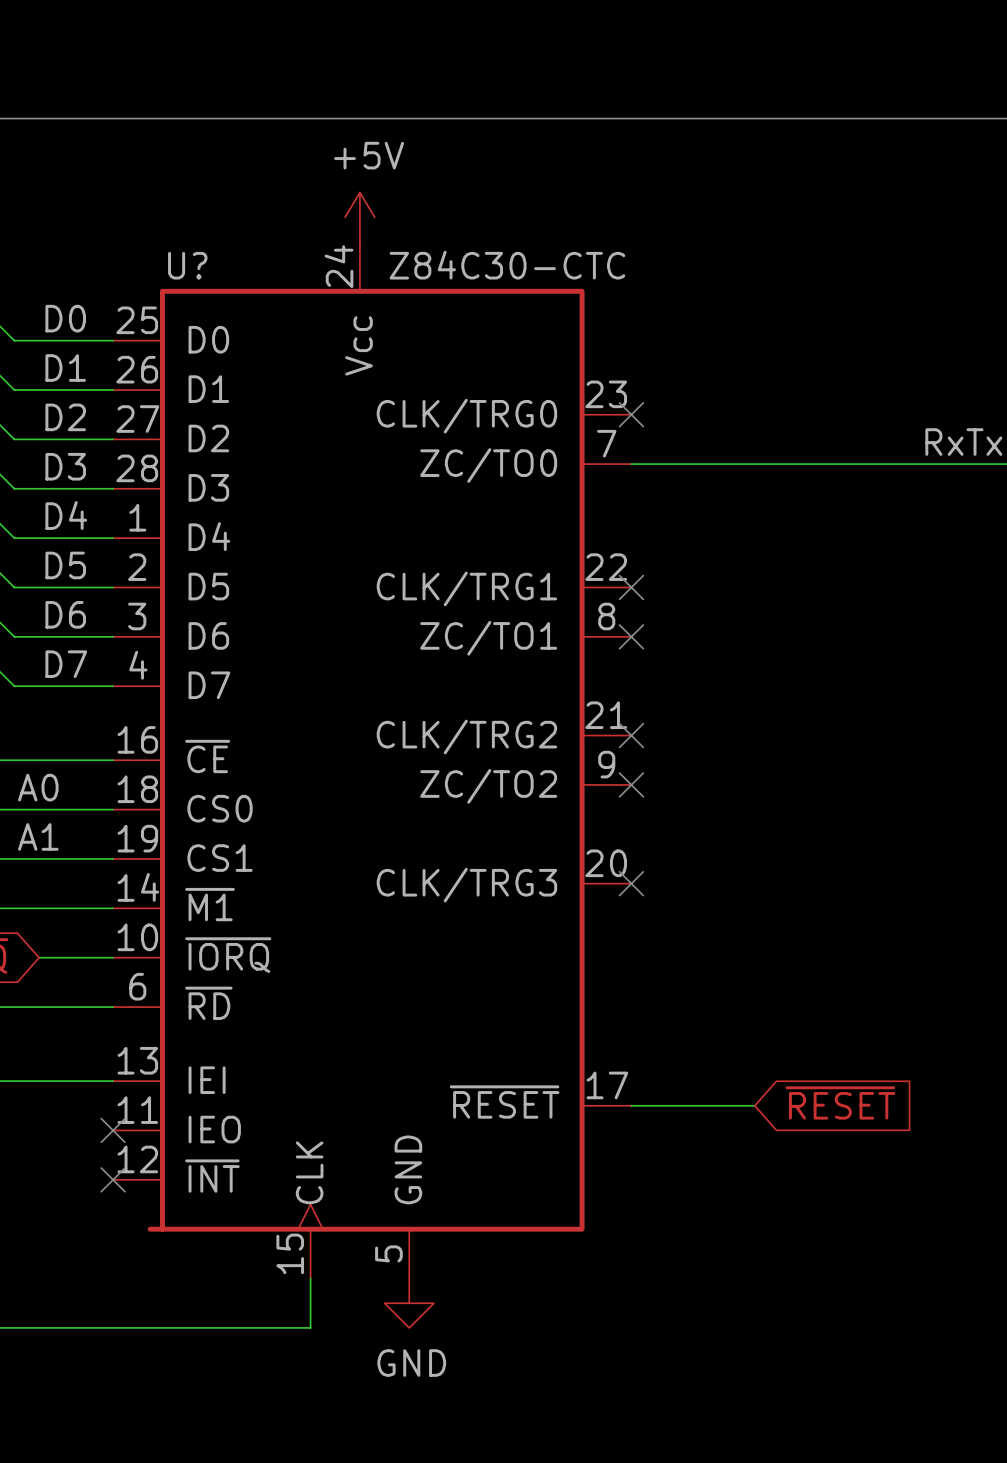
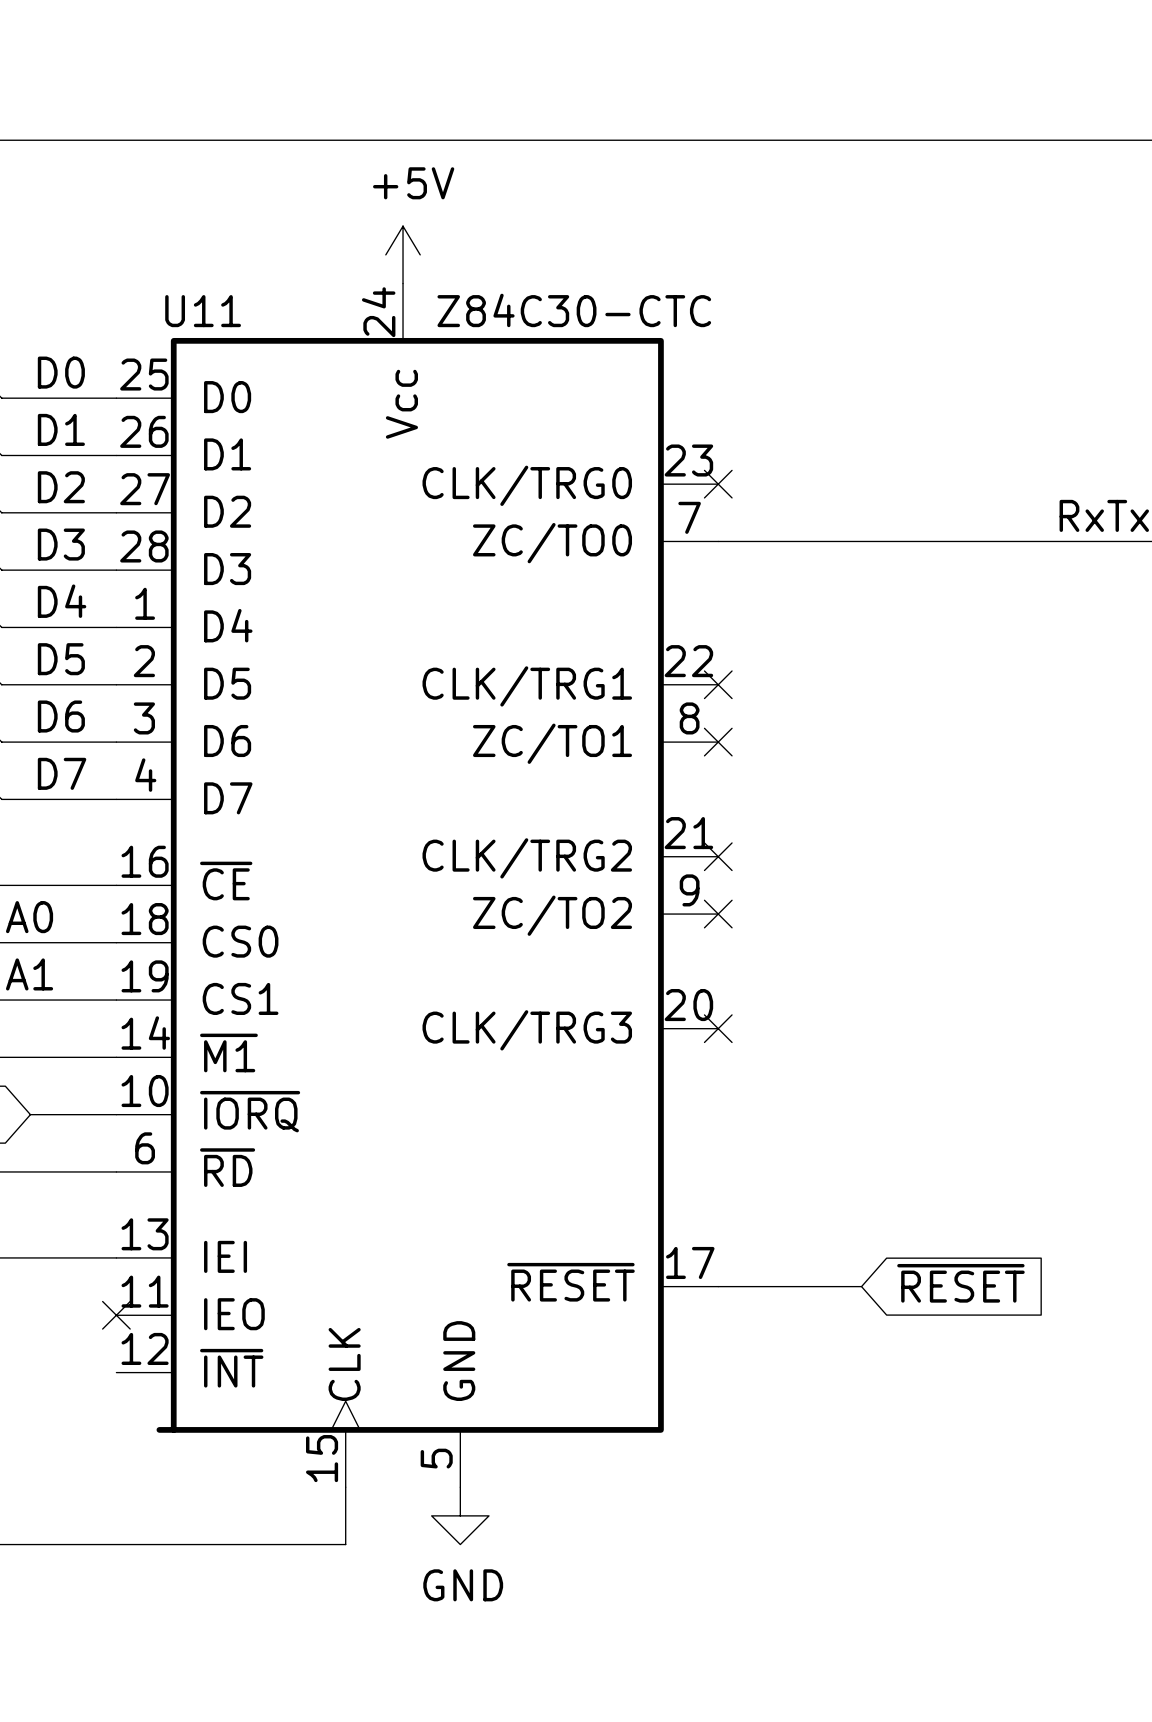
U? name: U? (187, 265) -> U11 (203, 311)
no-connect mark: (113, 1179) -> none

